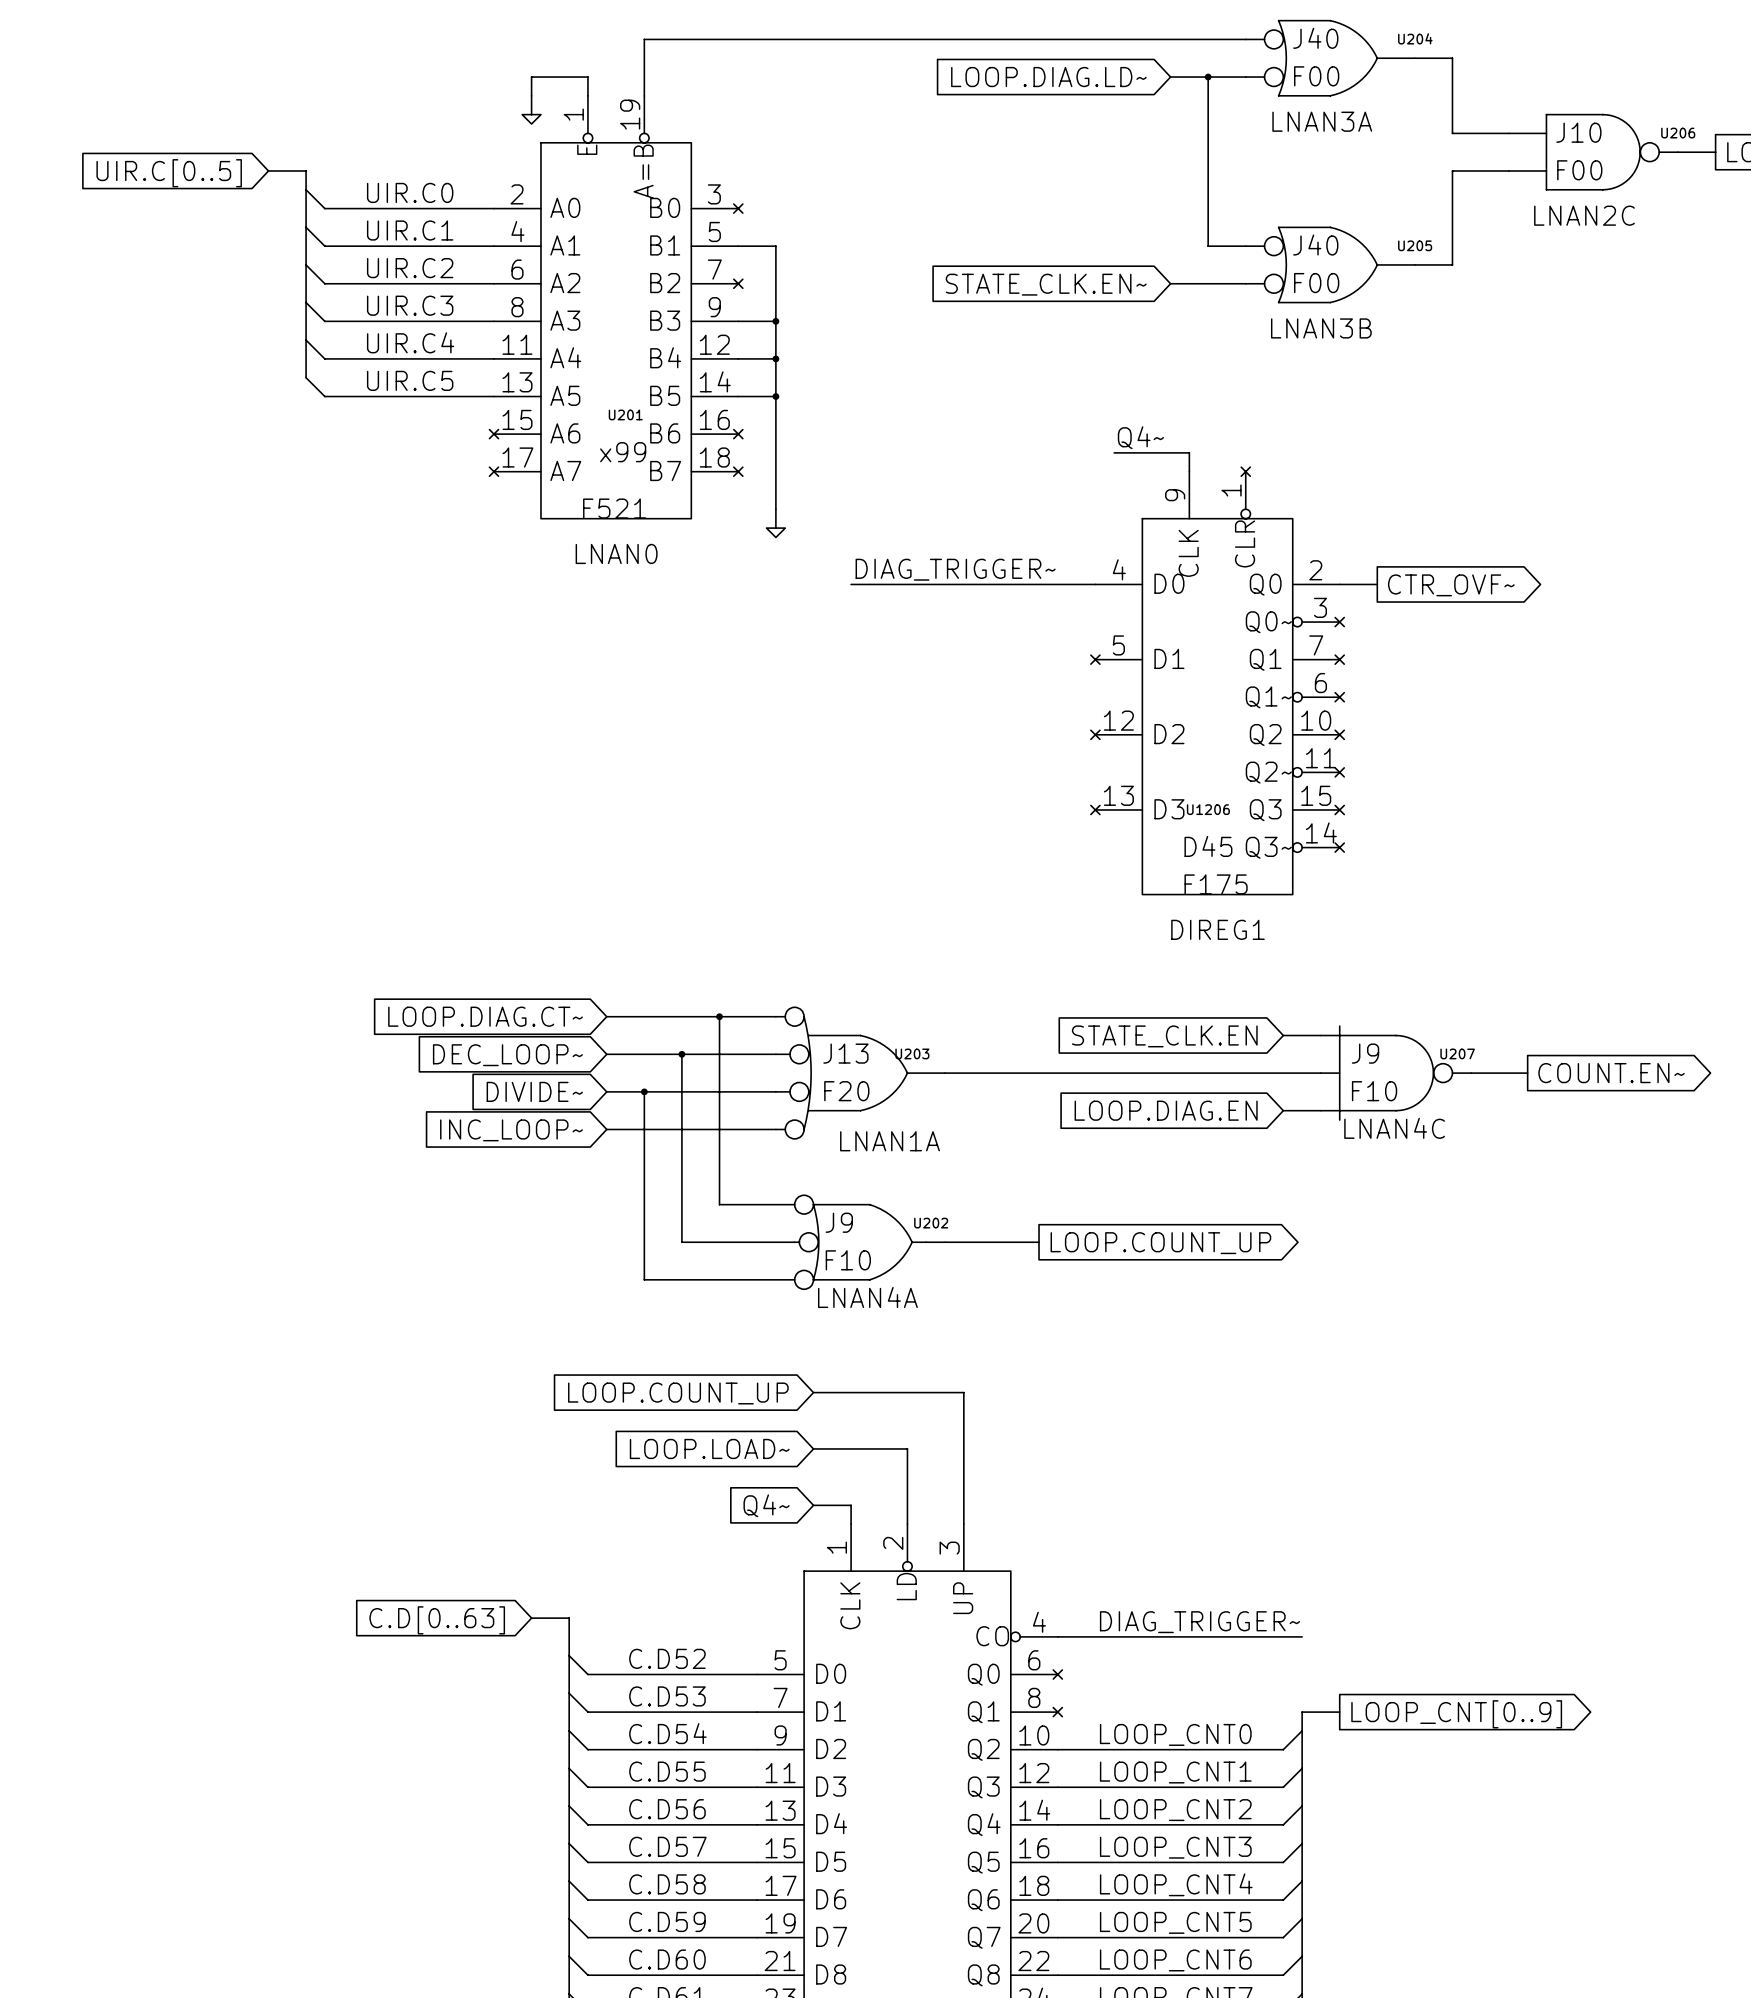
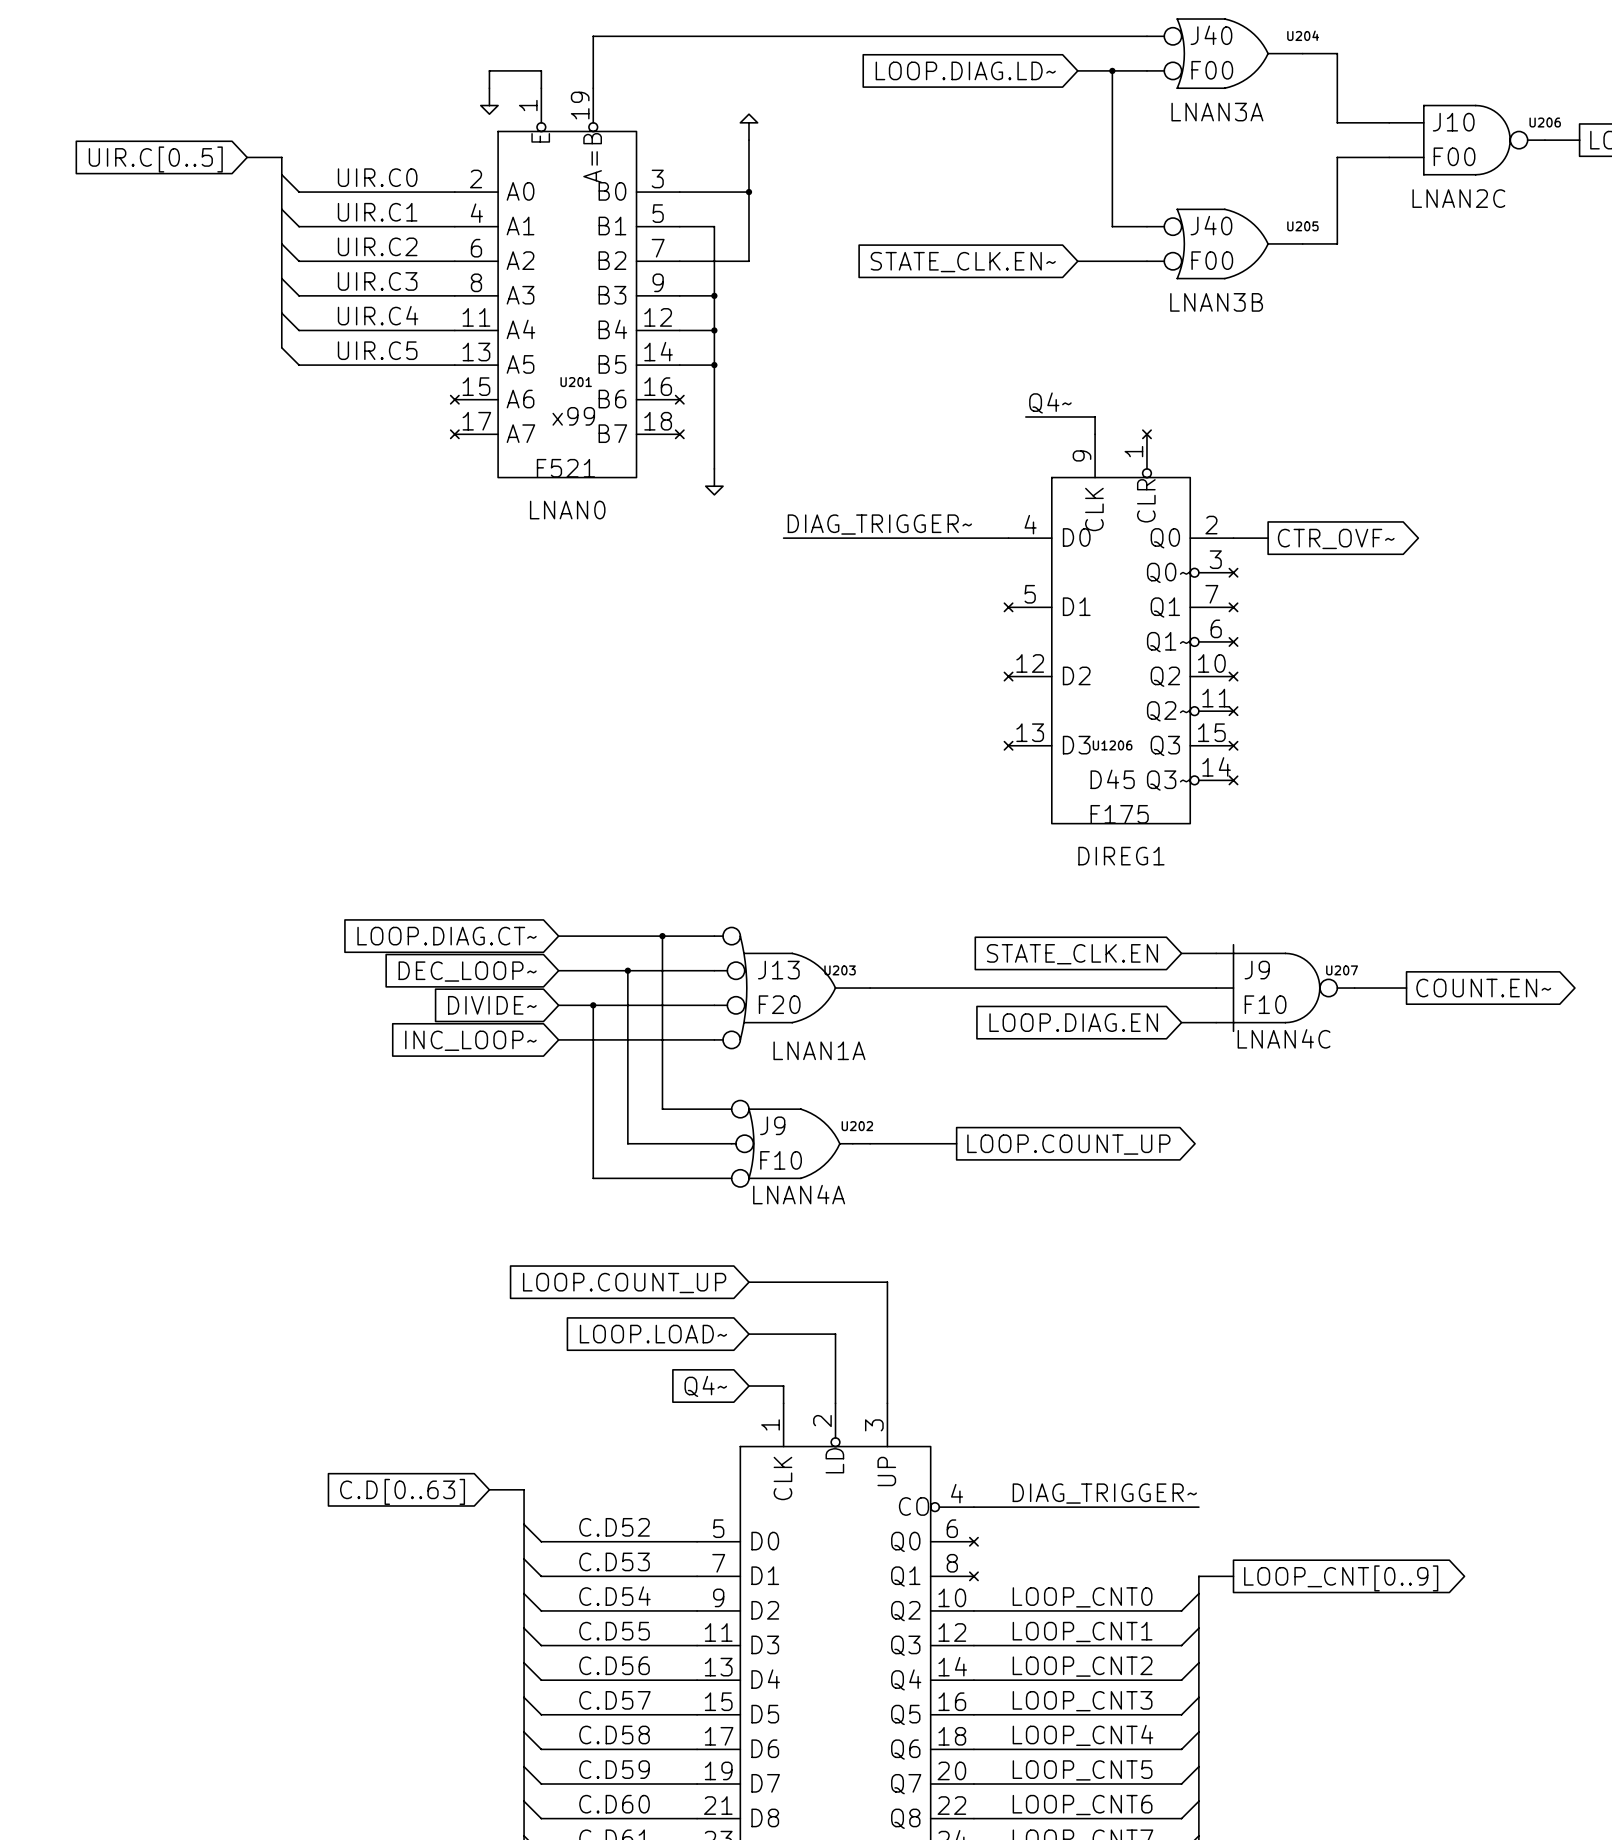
power symbol: none -> (748, 126)
wire: none -> (748, 140) (748, 261) (679, 261)
wire: none -> (679, 192) (748, 192)
no-connect mark: (738, 208) -> none
junction: none -> (748, 192)
no-connect mark: (738, 283) -> none

